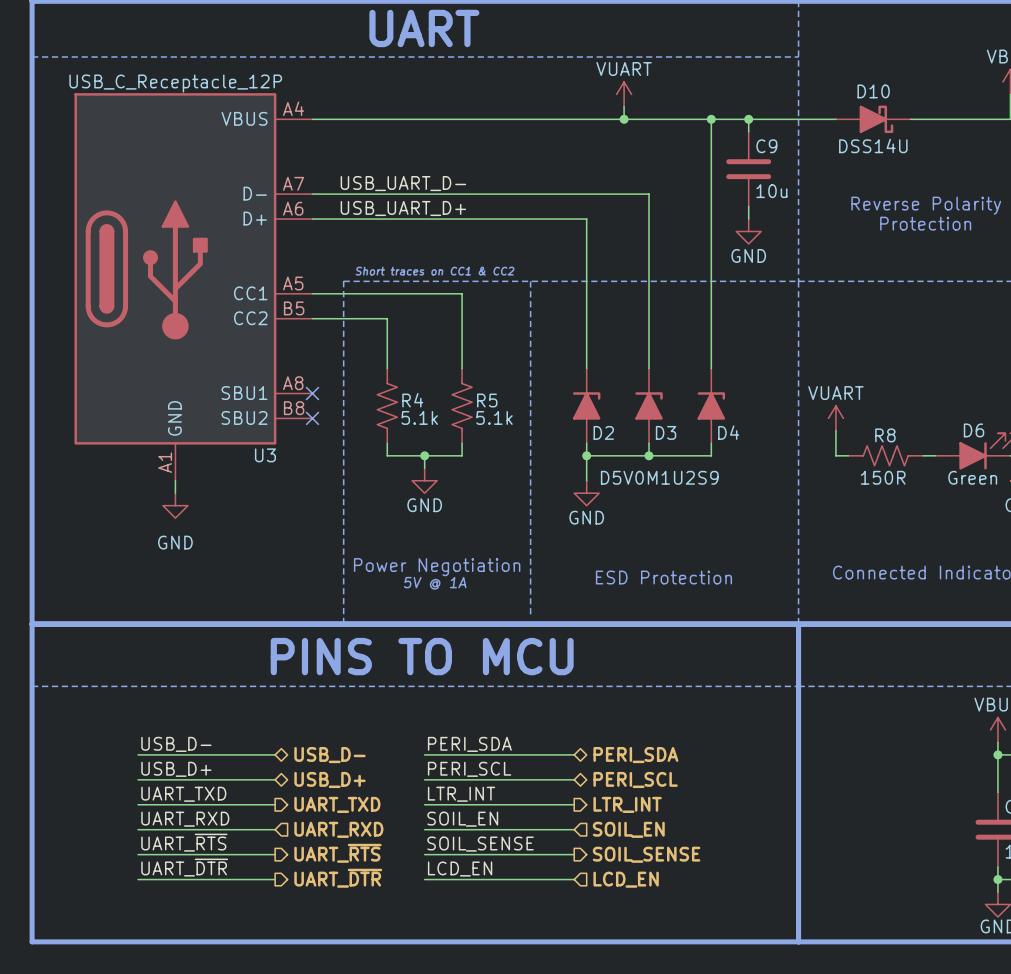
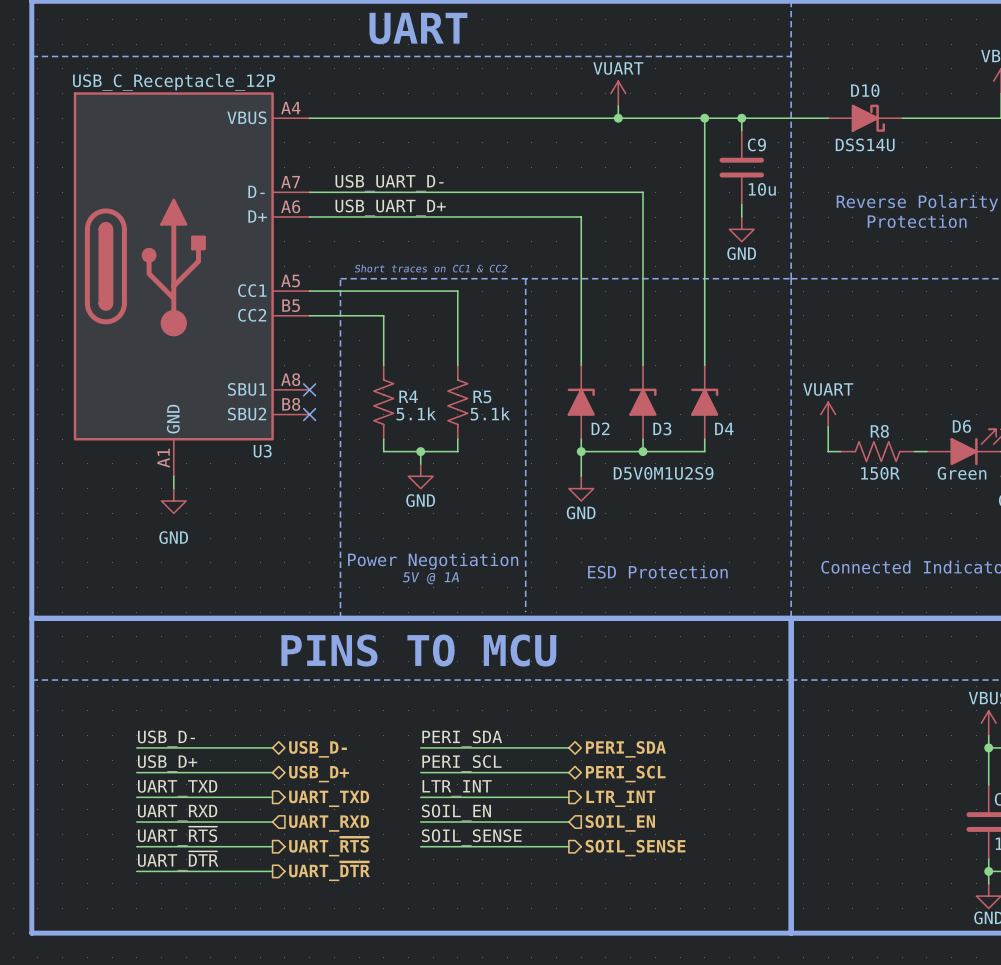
label: LCD_EN (460, 869) -> none
wire: (424, 879) (574, 879) -> none
hierarchical label: LCD_EN (626, 879) -> none

